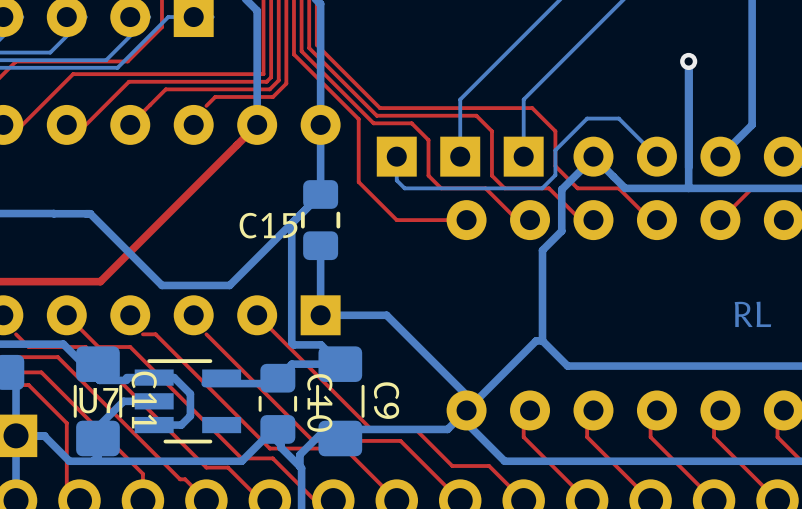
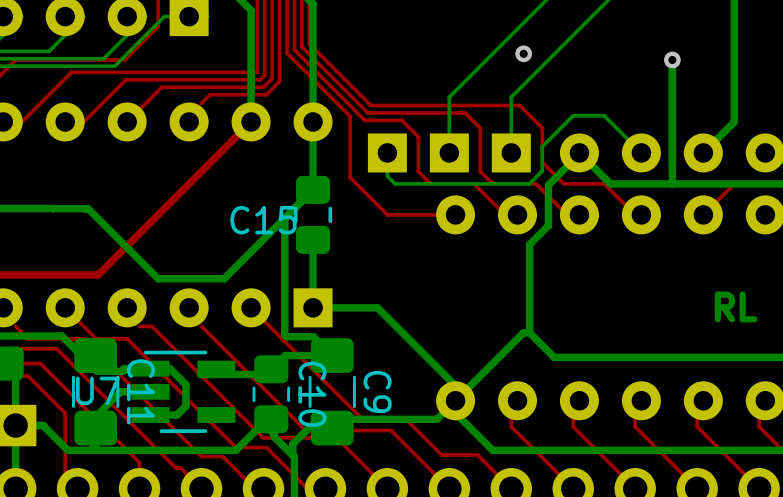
via: none -> (523, 53)

